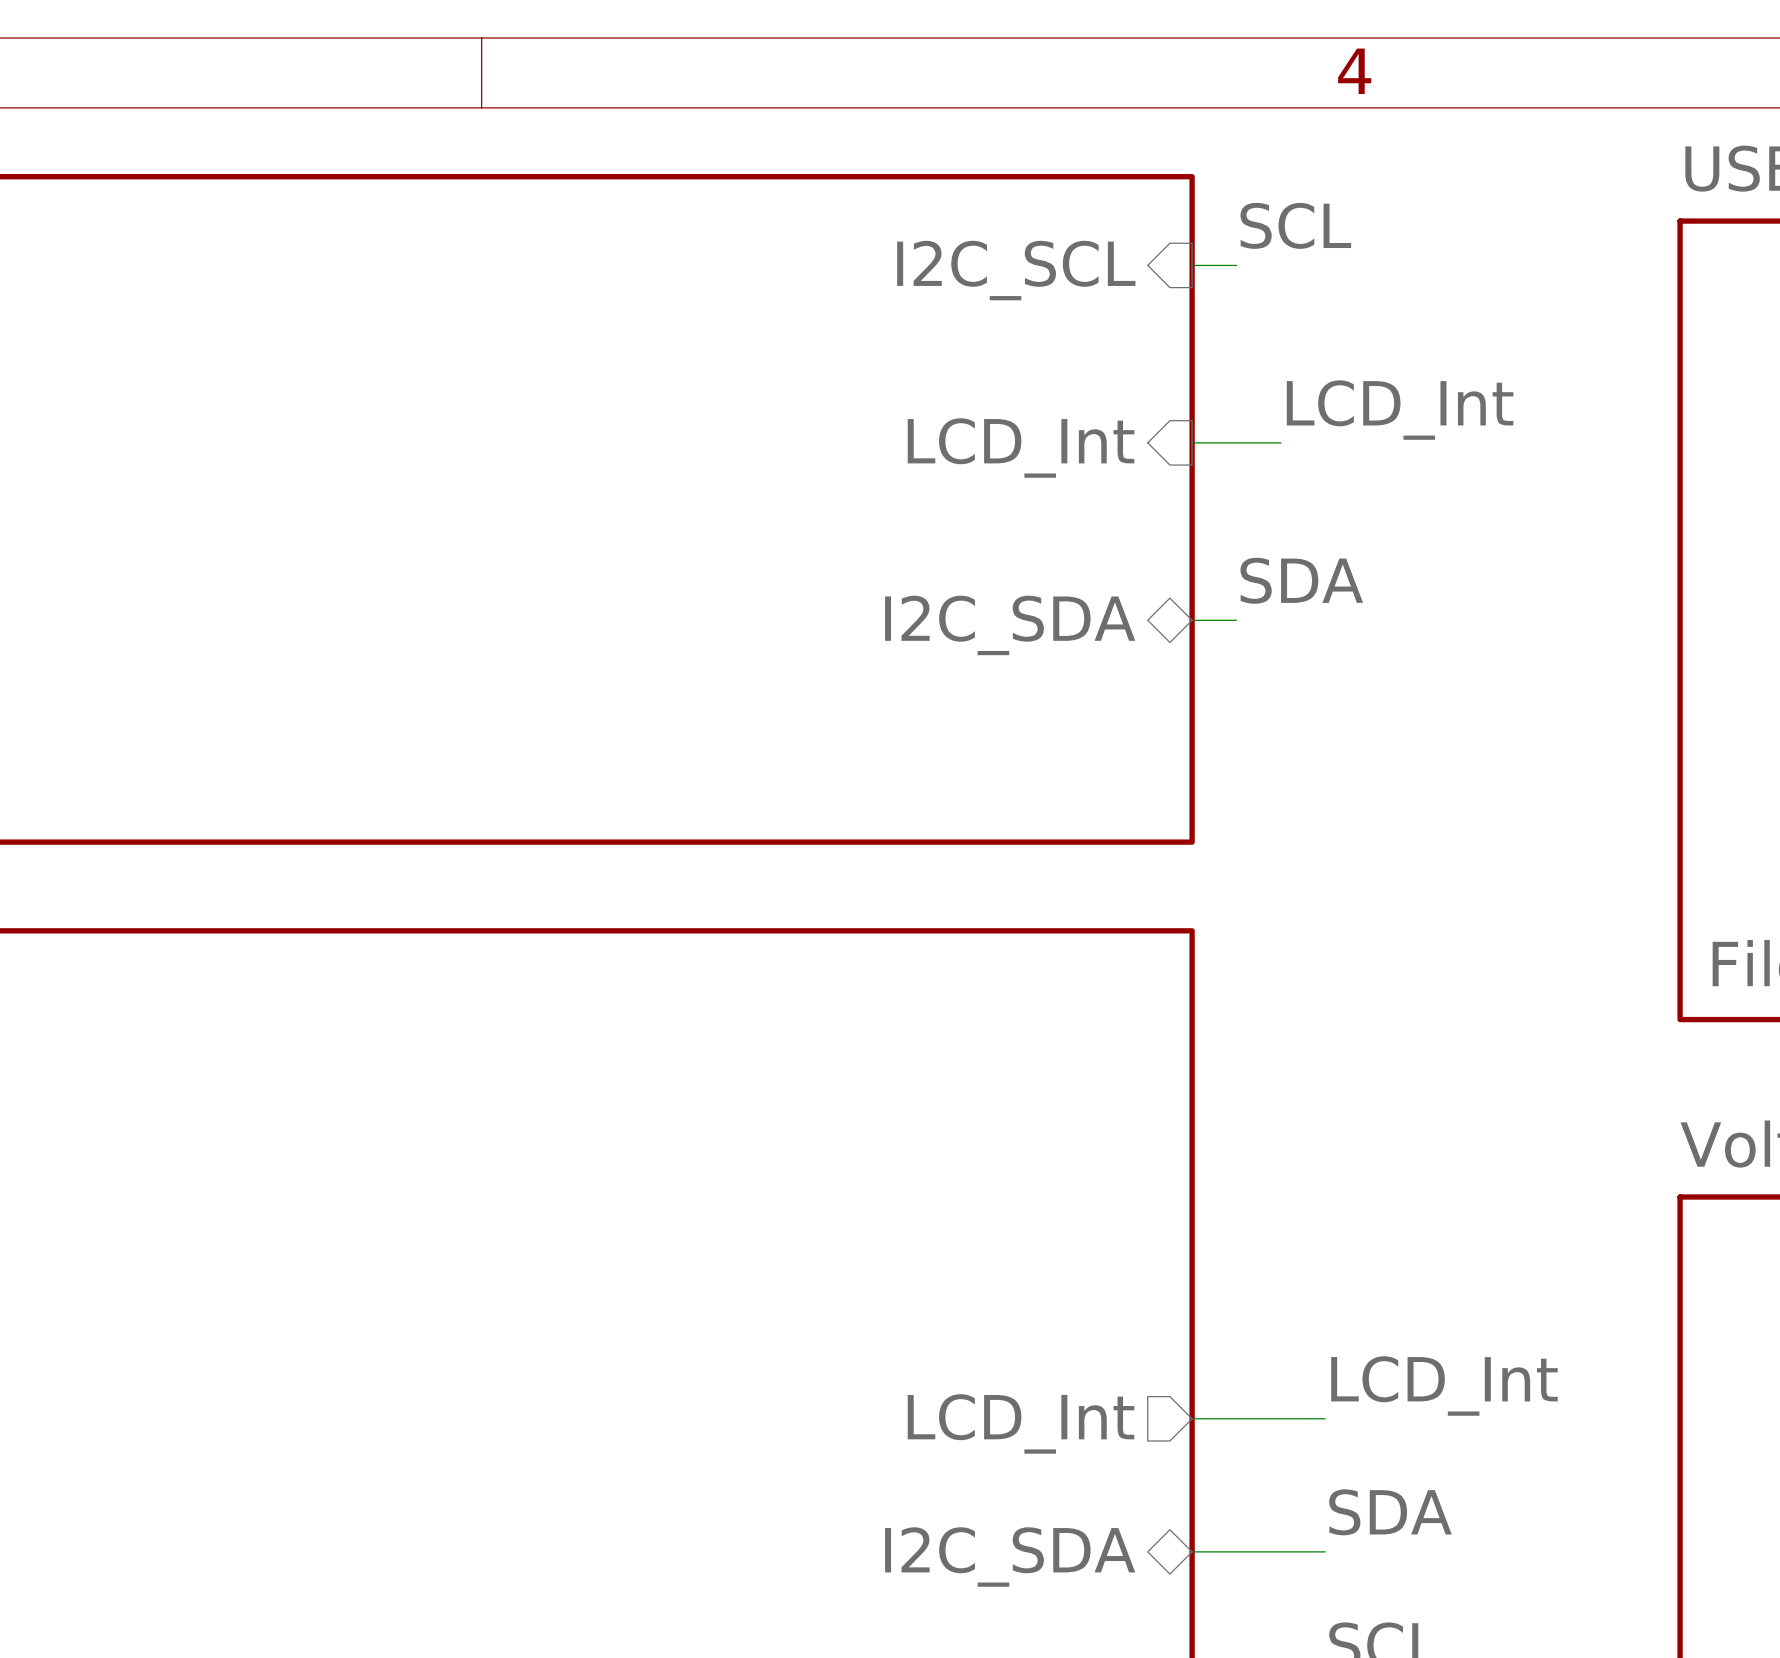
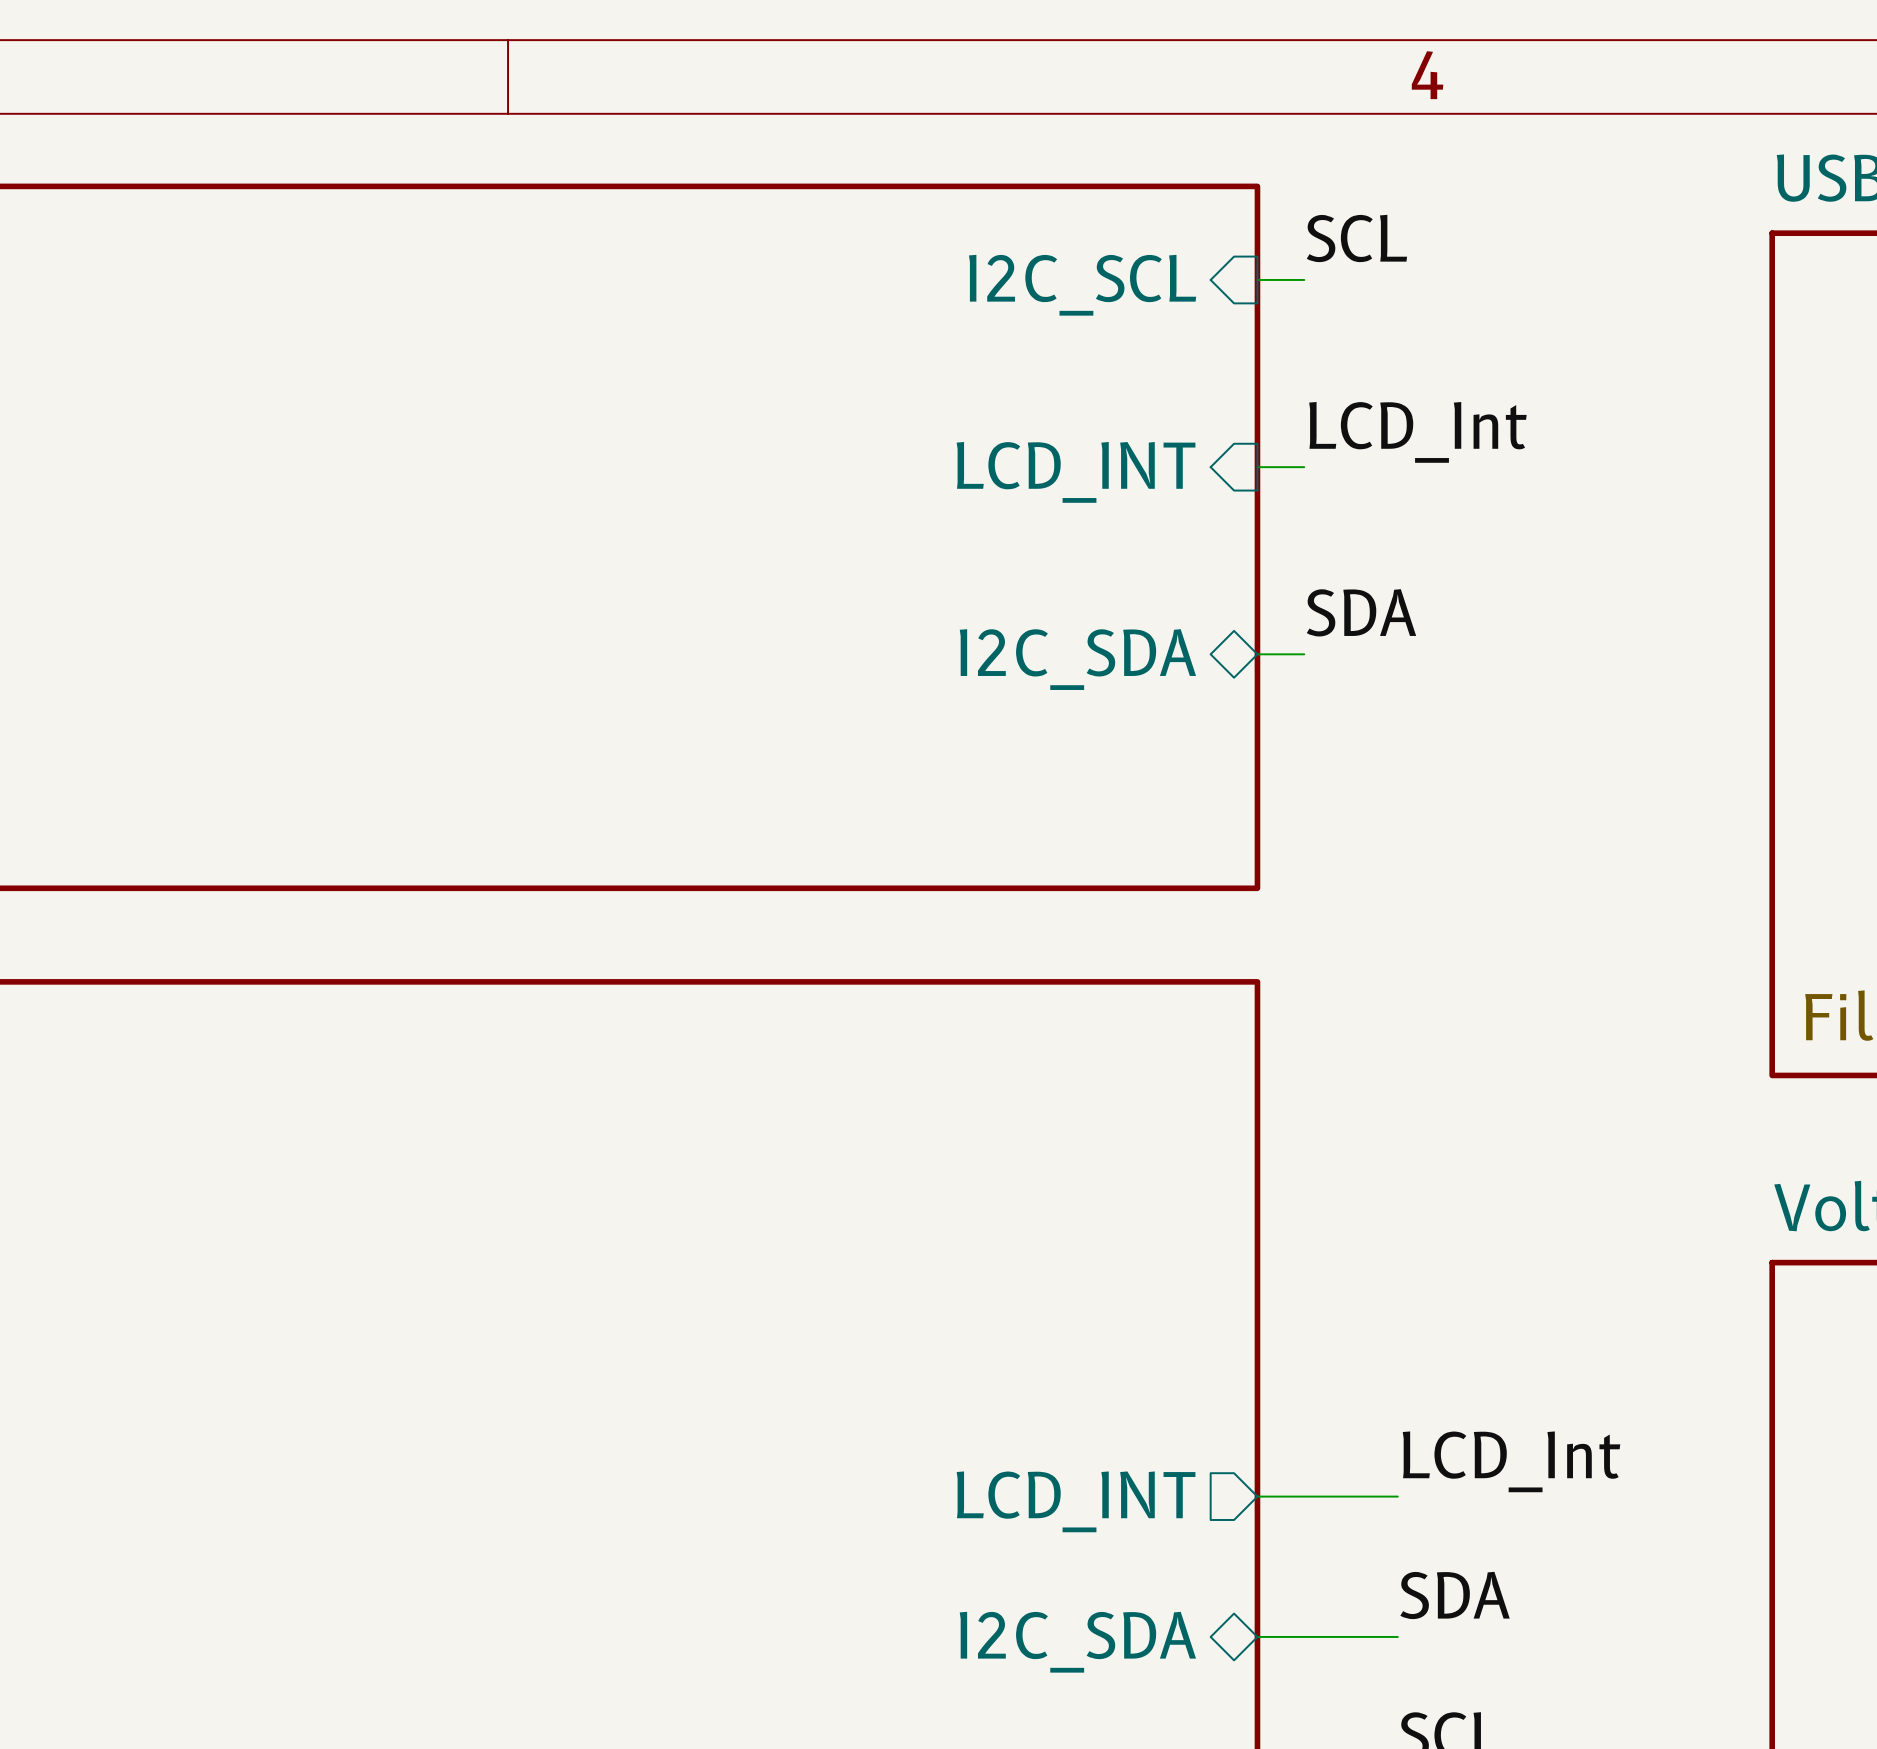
label position: LCD_Int (1400, 410) -> LCD_Int (1417, 432)
wire: (1236, 442) (1280, 442) -> none
sheet pin: LCD_Int (1021, 447) -> LCD_INT (1076, 472)
sheet pin: LCD_Int (1021, 1423) -> LCD_INT (1076, 1501)

